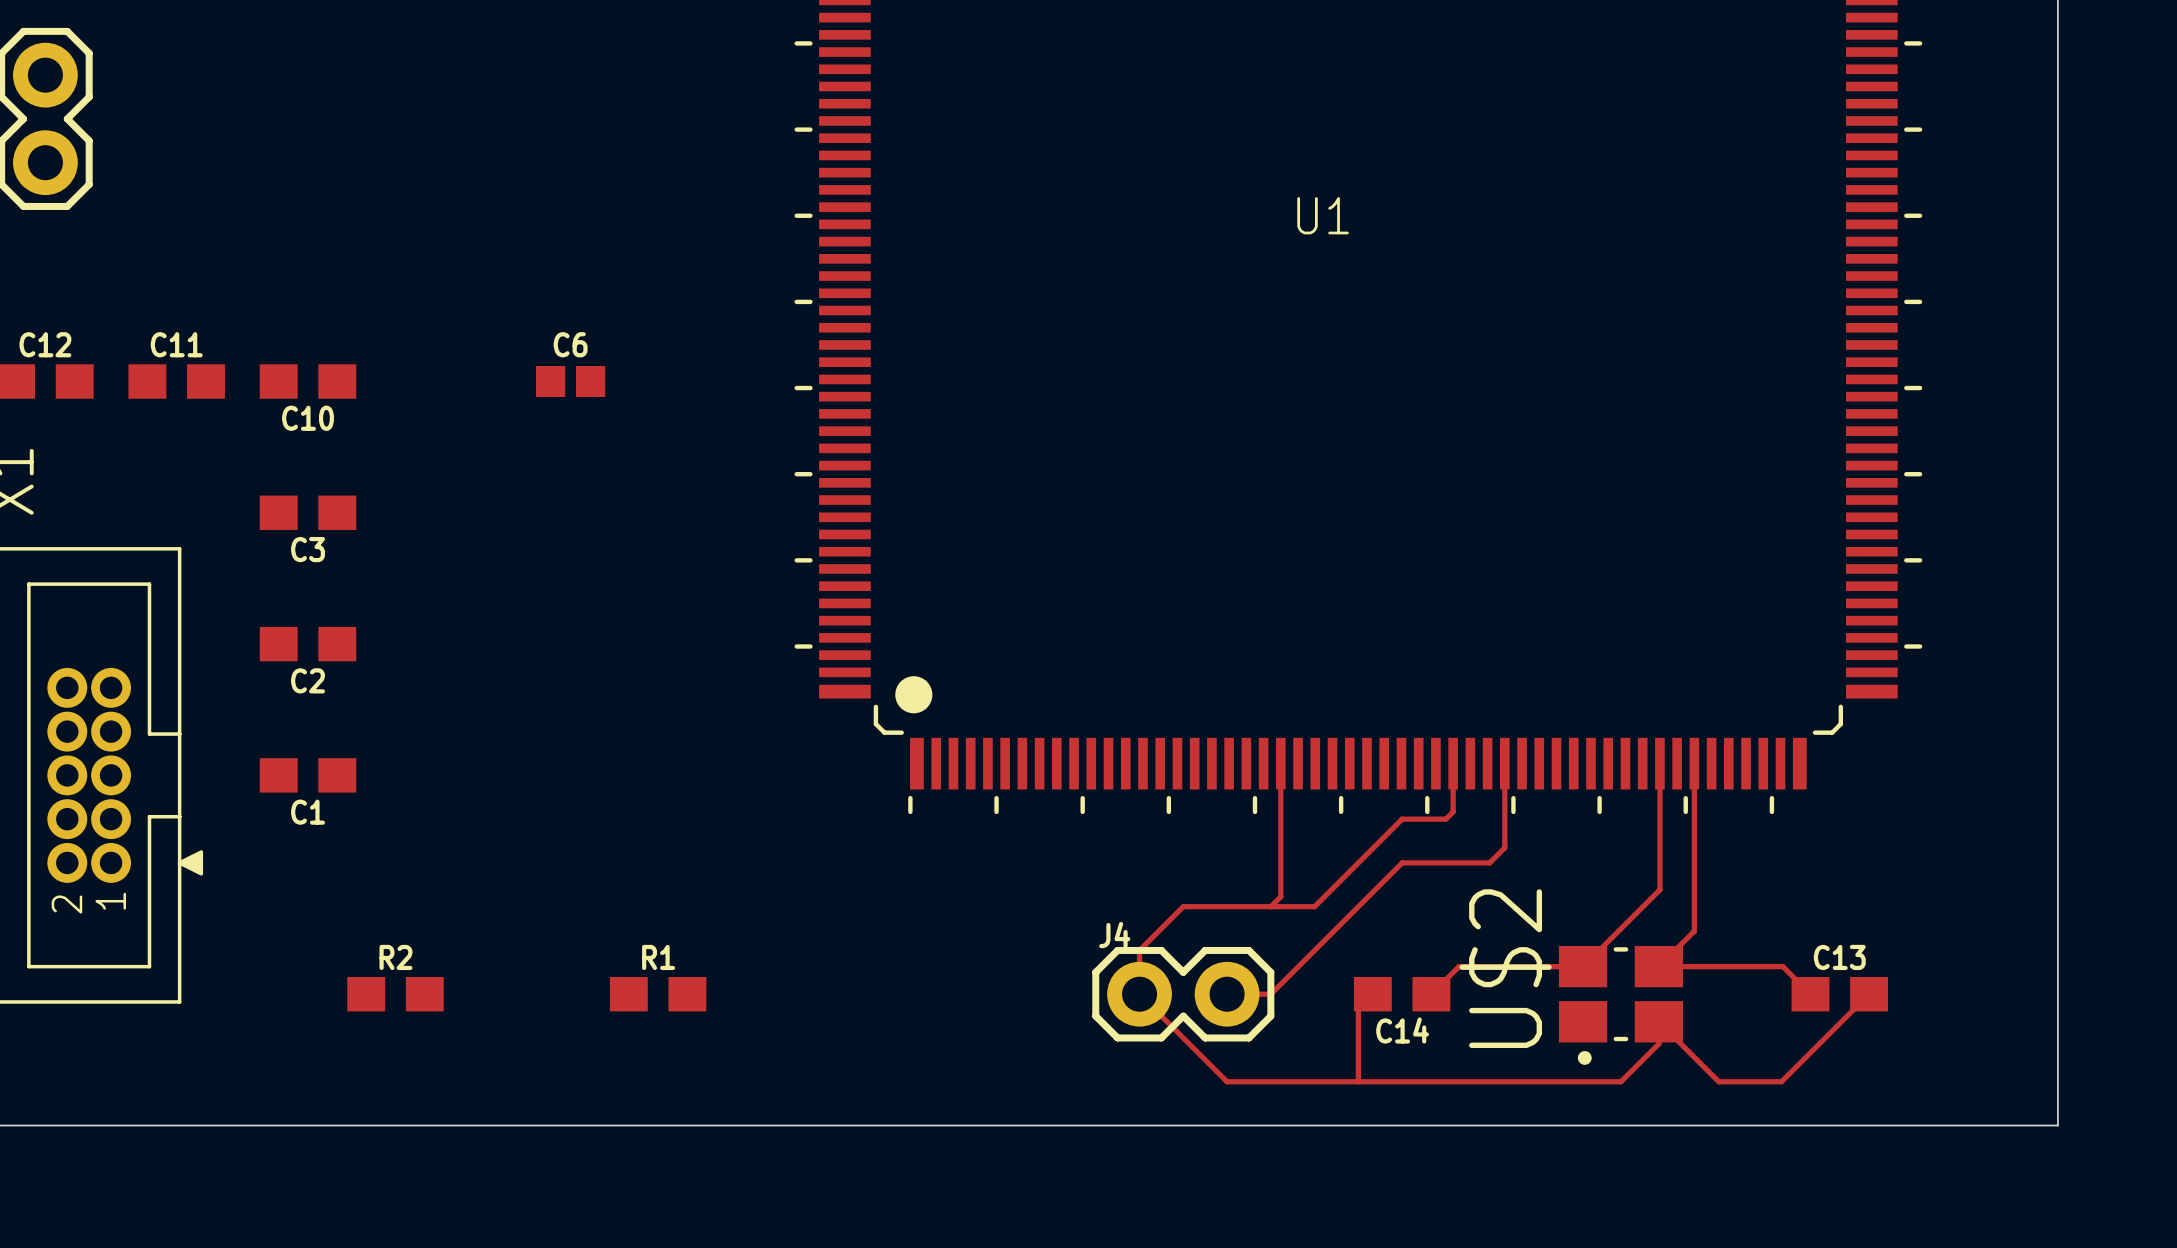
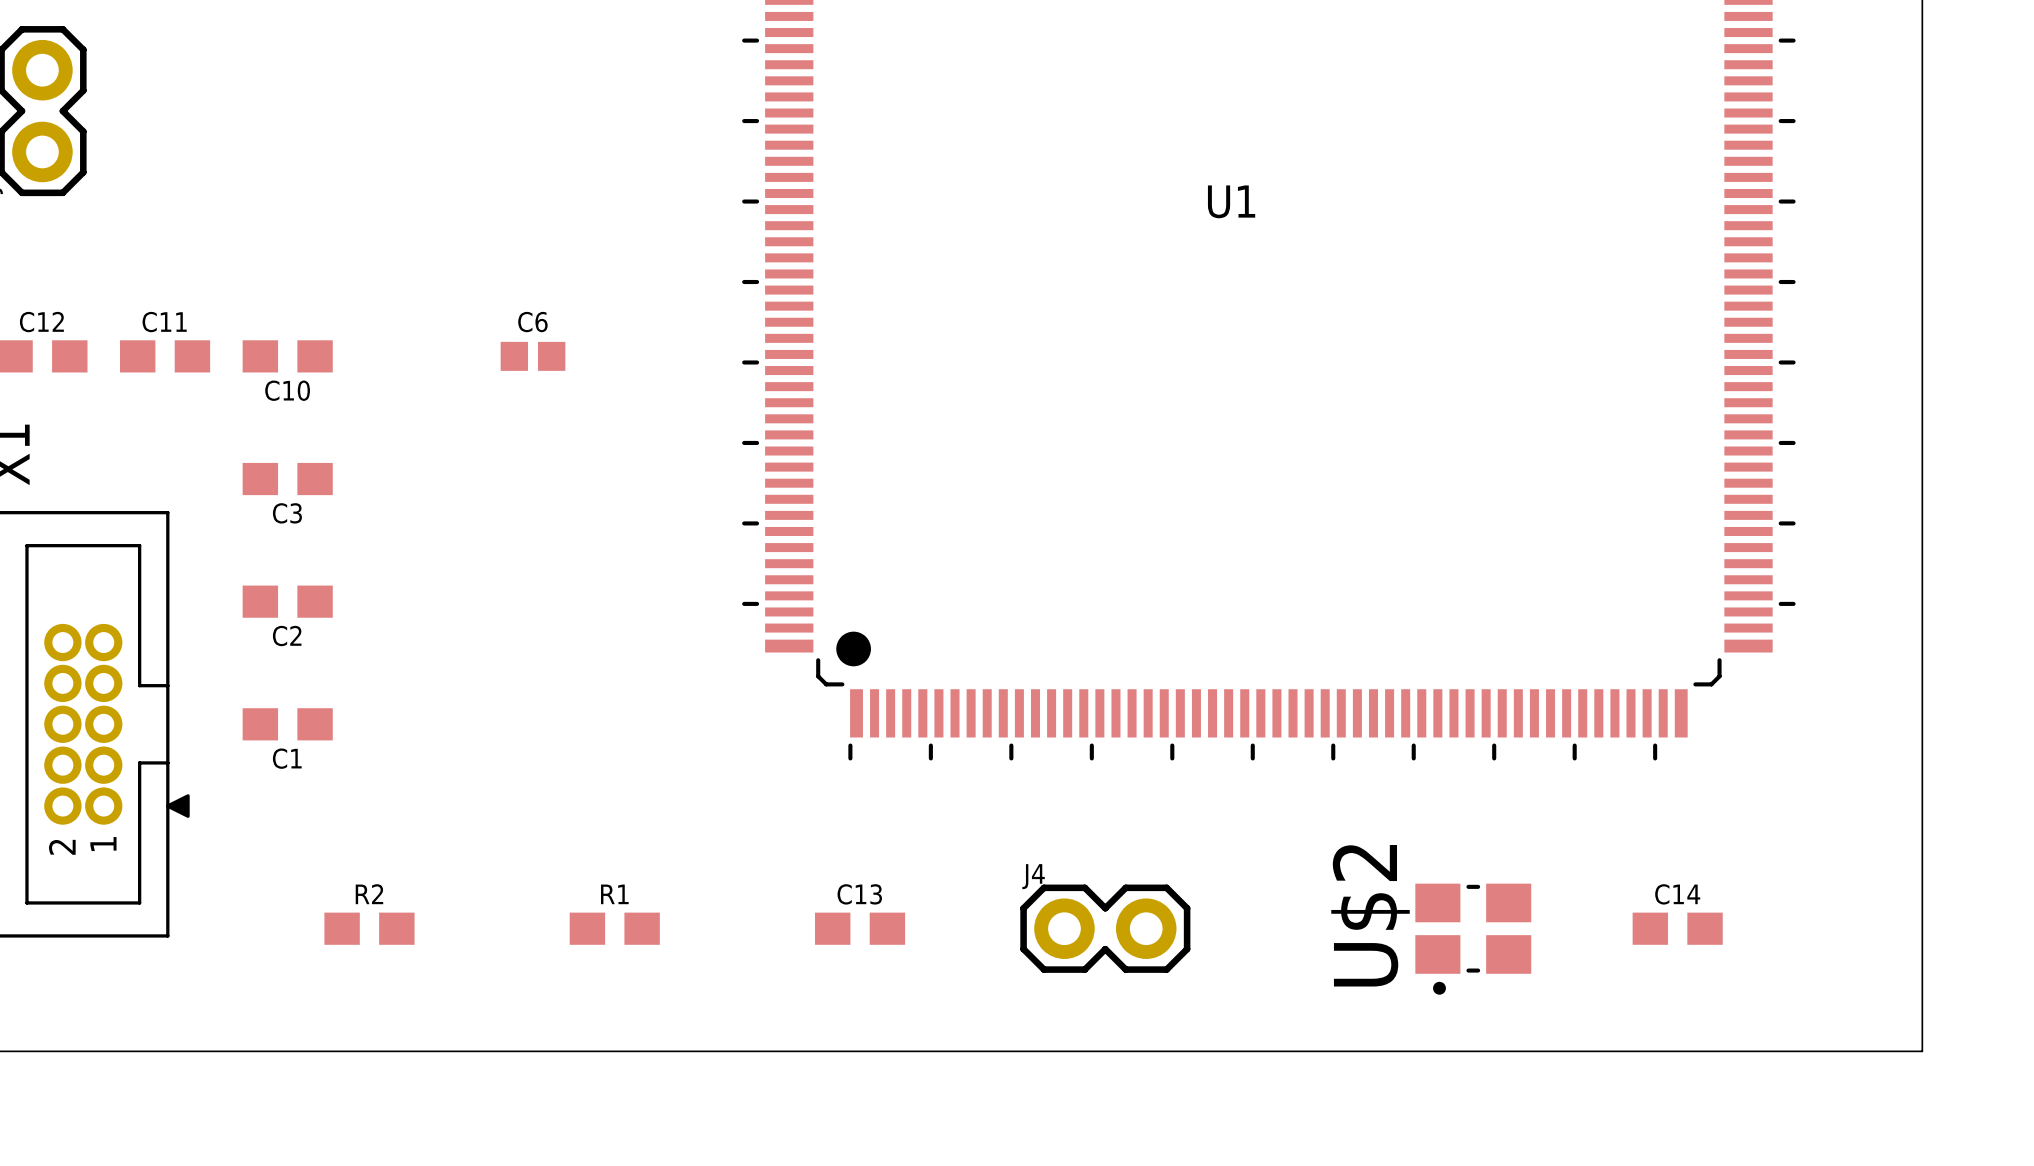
track: (1280, 763) (1280, 896) (1270, 906) -> none
track: (1453, 763) (1453, 811) (1445, 819) (1402, 819) (1314, 906) (1183, 906) (1139, 950) (1139, 994) (1227, 1081) (1620, 1081) (1658, 1043) (1658, 1021) (1718, 1081) (1781, 1081) (1869, 994) -> none
track: (1504, 763) (1504, 847) (1489, 862) (1402, 862) (1270, 994) (1227, 994) -> none
track: (1659, 763) (1659, 889) (1583, 966) (1459, 966) (1431, 994) -> none
track: (1694, 763) (1694, 931) (1658, 966) (1782, 966) (1810, 994) -> none
track: (1372, 994) (1358, 1008) (1358, 1081) -> none
C14 position: (1402, 994) -> (1677, 928)
C13 position: (1839, 994) -> (860, 928)
U$2 position: (1620, 1005) -> (1473, 939)
C14 name position: C14 (1402, 1030) -> C14 (1677, 894)

